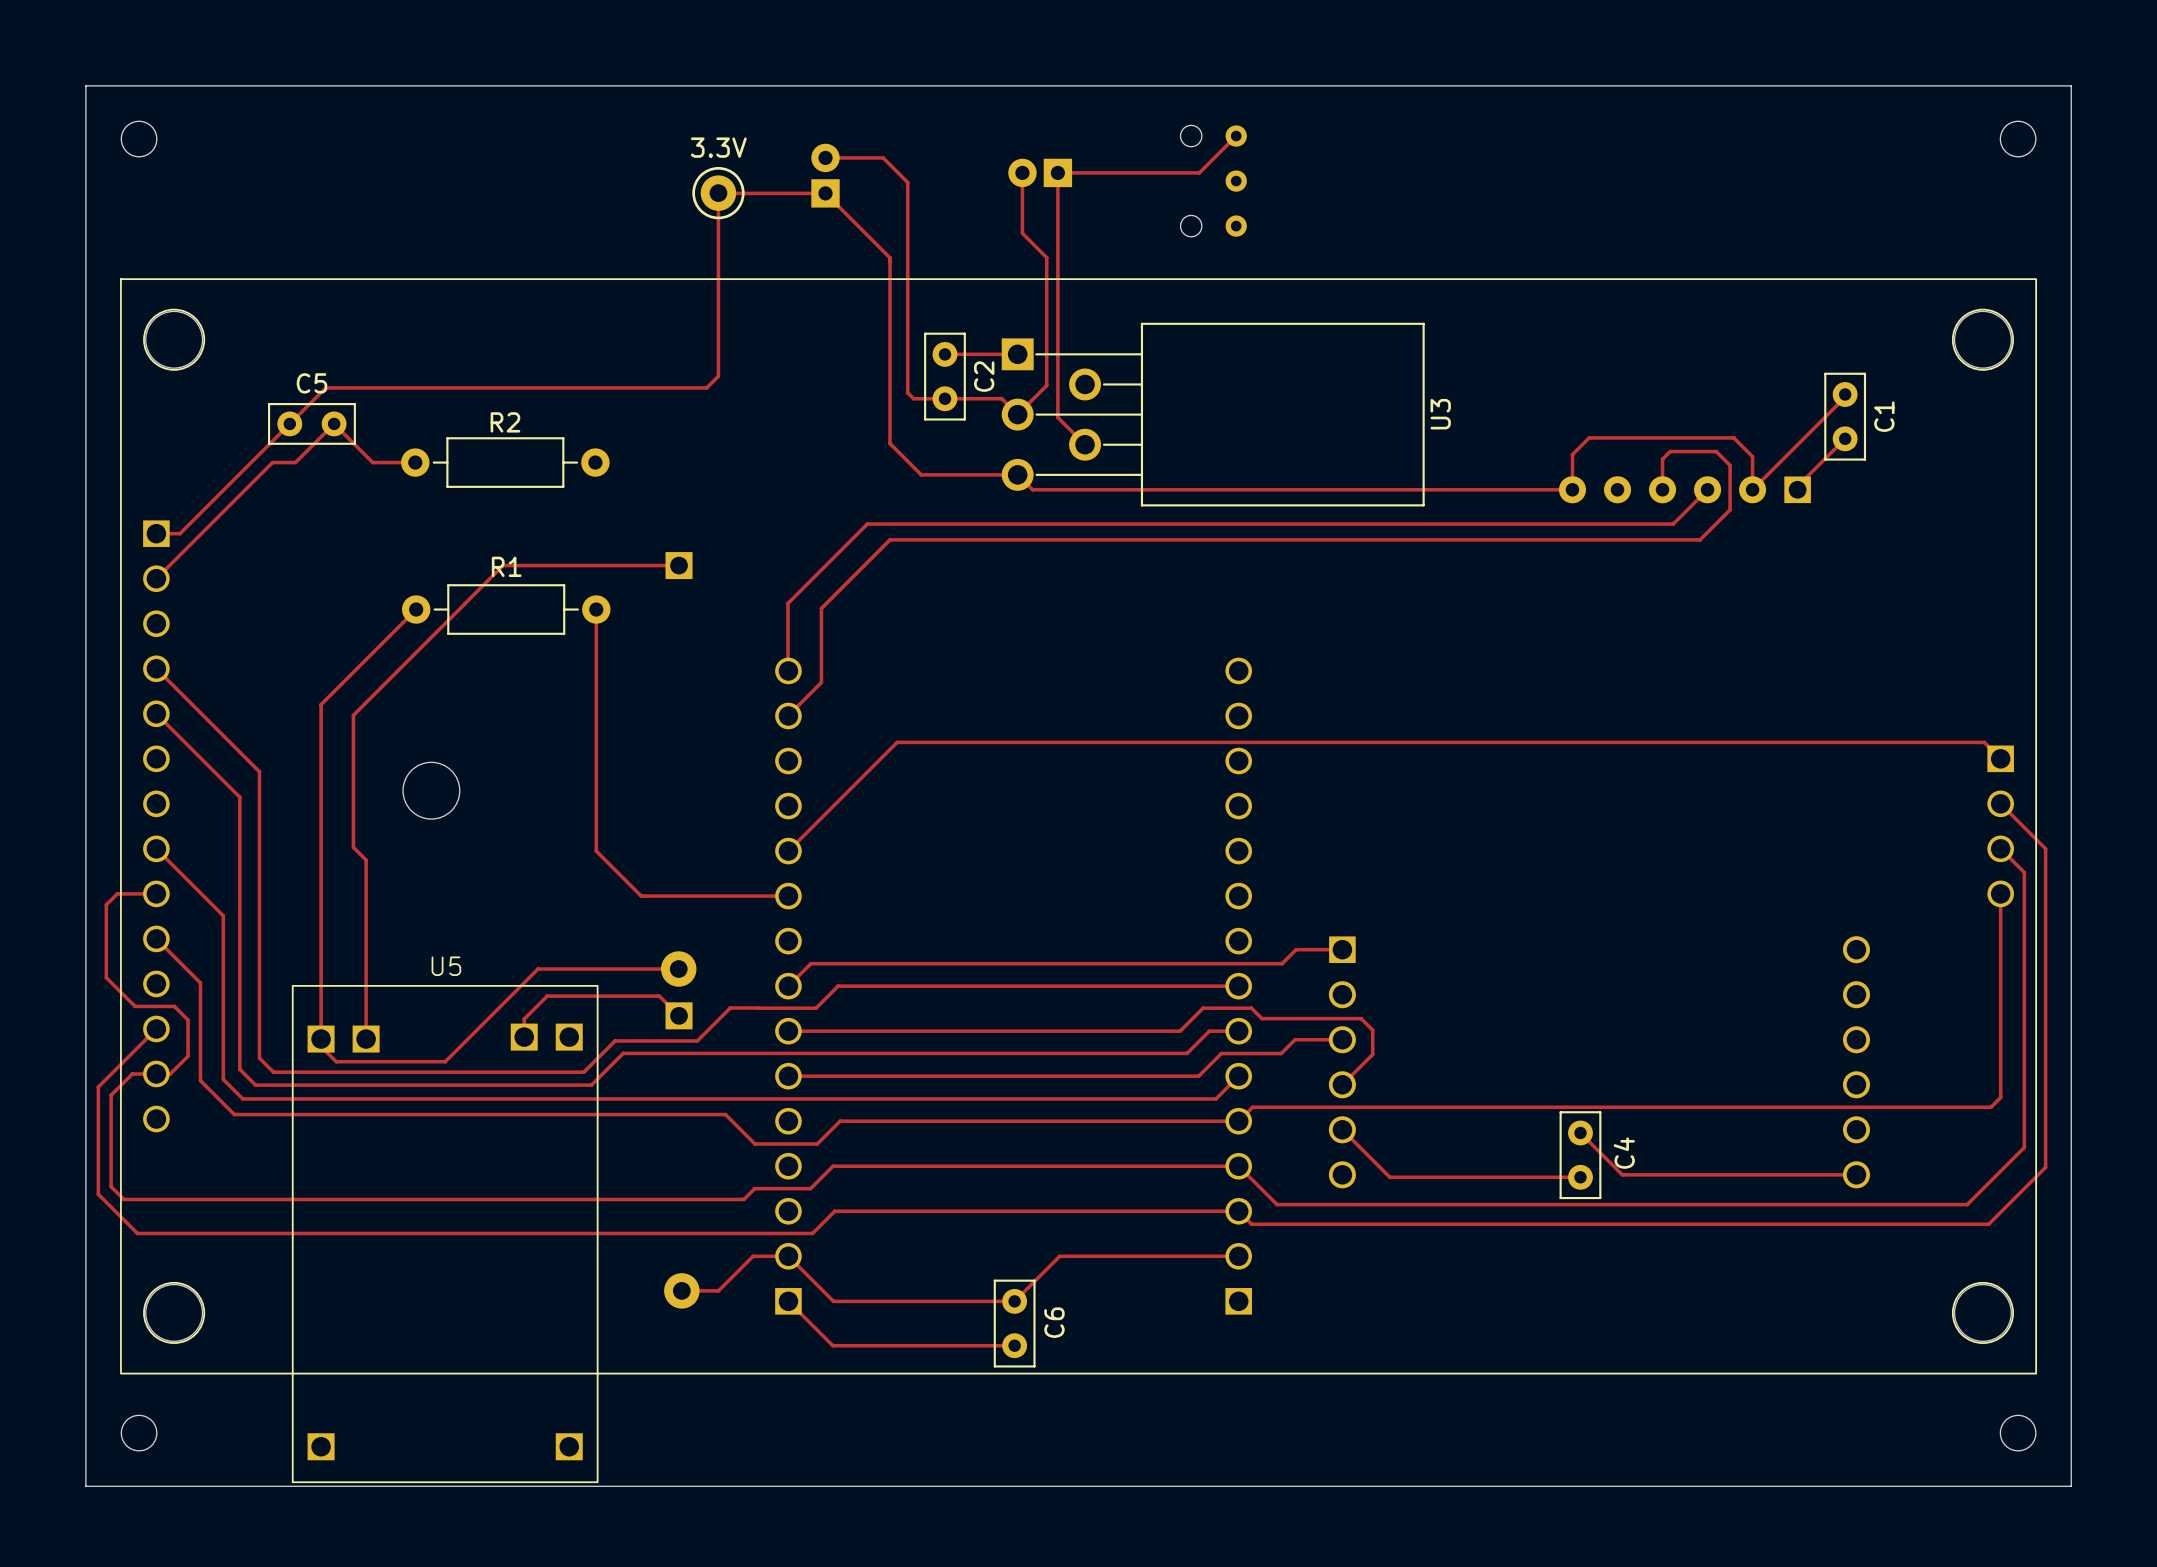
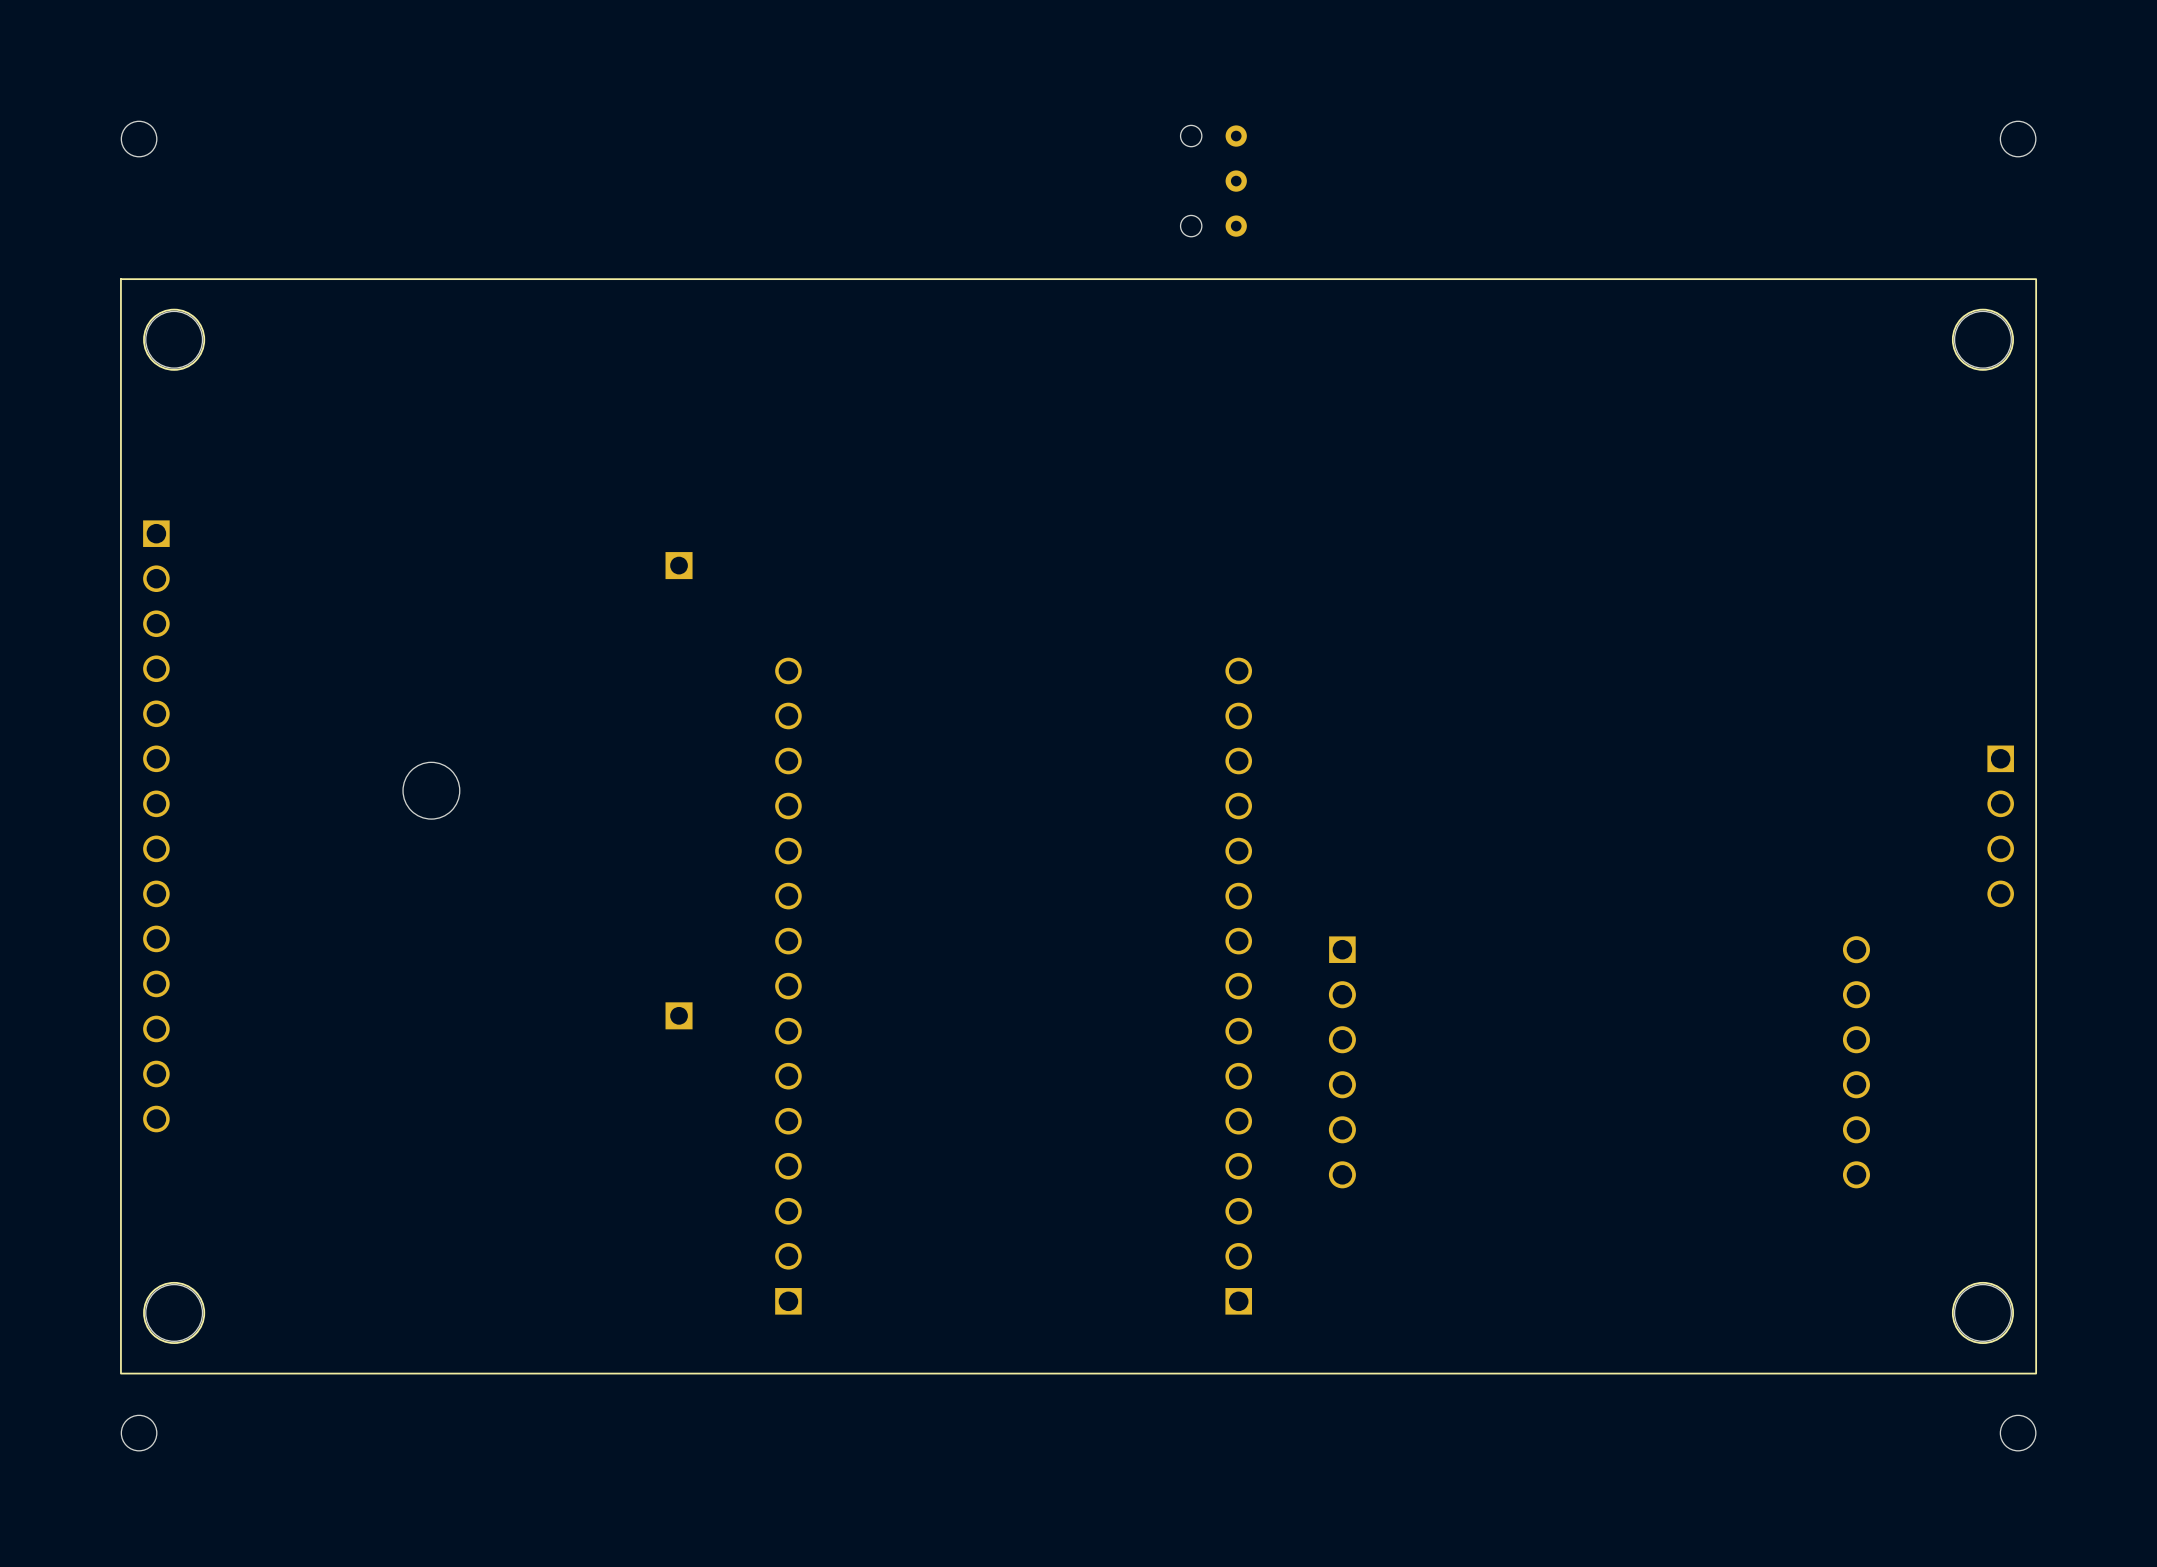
board edge: (85, 85) (2071, 85) (2071, 1486) (85, 1486) (85, 85) -> none
track: (1236, 136) (1199, 172) (1057, 172) (1057, 417) (1085, 444) -> none
track: (825, 157) (883, 157) (907, 182) (907, 392) (913, 398) (1001, 398) (1017, 414) (1046, 385) (1046, 257) (1022, 233) (1022, 172) -> none
part: (1040, 172) -> none
part: (825, 175) -> none
track: (824, 192) (890, 257) -> none
3.3V: (718, 193) -> none
track: (825, 193) (718, 193) (718, 376) (706, 387) (325, 387) (180, 533) (156, 533) -> none
track: (890, 257) (890, 443) (921, 474) (1017, 474) (1032, 489) (1572, 489) (1572, 454) (1589, 437) (1733, 437) -> none
track: (945, 354) (1017, 354) -> none
C2: (944, 376) -> none
track: (1845, 394) (1845, 397) (1752, 489) (1752, 456) (1733, 438) -> none
U3: (1213, 414) -> none
C1: (1845, 416) -> none
C5: (311, 423) -> none
track: (1845, 438) (1797, 486) (1797, 489) -> none
track: (415, 462) (372, 462) (334, 423) (295, 462) (272, 462) (156, 578) -> none
R2: (505, 462) -> none
track: (1662, 489) (1662, 459) (1670, 451) (1716, 451) (1730, 465) (1730, 509) (1700, 539) (890, 539) (821, 608) (821, 682) (787, 715) -> none
part: (1684, 489) -> none
track: (1707, 489) (1673, 524) (867, 524) (787, 603) (787, 670) -> none
track: (679, 565) (503, 565) (465, 603) -> none
track: (465, 603) (353, 715) (353, 847) (366, 860) (366, 1039) -> none
track: (416, 609) (321, 704) (321, 1046) (336, 1061) (445, 1061) (537, 969) (678, 969) -> none
R1: (506, 609) -> none
track: (596, 609) (596, 851) (641, 896) (788, 896) -> none
track: (156, 668) (259, 771) (259, 1058) (273, 1072) (583, 1072) (615, 1040) (697, 1040) (730, 1008) (757, 1008) -> none
track: (156, 713) (239, 797) (239, 1069) (255, 1085) (591, 1085) (623, 1053) (1187, 1053) (1209, 1031) (1238, 1031) -> none
track: (2000, 758) (1984, 742) (897, 742) (788, 851) -> none
track: (2000, 803) (2045, 848) (2045, 1167) (1988, 1224) (1251, 1224) (1238, 1211) (834, 1211) (812, 1233) (137, 1233) (98, 1194) (98, 1087) (156, 1028) -> none
track: (156, 848) (223, 915) (223, 1079) (242, 1098) (1215, 1098) (1238, 1076) -> none
track: (2000, 848) (2024, 872) (2024, 1147) (1967, 1204) (1277, 1204) (1238, 1166) (833, 1166) (810, 1188) (754, 1188) (743, 1199) (123, 1199) (111, 1186) (111, 1095) (132, 1073) (170, 1073) (188, 1056) (188, 1020) (174, 1006) (135, 1006) (106, 977) (106, 904) (117, 893) (156, 893) -> none
track: (2000, 893) (2000, 1097) (1991, 1107) (1252, 1107) (1238, 1121) (840, 1121) (817, 1143) (754, 1143) (725, 1114) (234, 1114) (200, 1080) (200, 982) (156, 938) -> none
track: (1342, 949) (1296, 949) (1282, 963) (810, 963) (788, 986) -> none
part: (678, 969) -> none
track: (1238, 986) (838, 986) (816, 1008) (758, 1008) -> none
track: (679, 1015) (659, 996) (547, 996) (524, 1019) (524, 1037) -> none
track: (788, 1031) (1180, 1031) (1203, 1008) (1251, 1008) (1261, 1018) (1361, 1018) (1372, 1030) (1372, 1054) (1342, 1084) -> none
track: (1342, 1039) (1295, 1039) (1281, 1053) (1221, 1053) (1198, 1076) (788, 1076) -> none
track: (1342, 1129) (1389, 1177) (1580, 1177) -> none
track: (1580, 1132) (1622, 1174) (1856, 1174) -> none
C4: (1580, 1155) -> none
U5: (445, 1234) -> none
track: (787, 1256) (753, 1256) (718, 1290) (681, 1290) -> none
track: (788, 1256) (833, 1301) (1014, 1301) (1059, 1256) (1238, 1256) -> none
part: (681, 1290) -> none
track: (788, 1301) (832, 1345) (1014, 1345) -> none
C6: (1014, 1323) -> none

